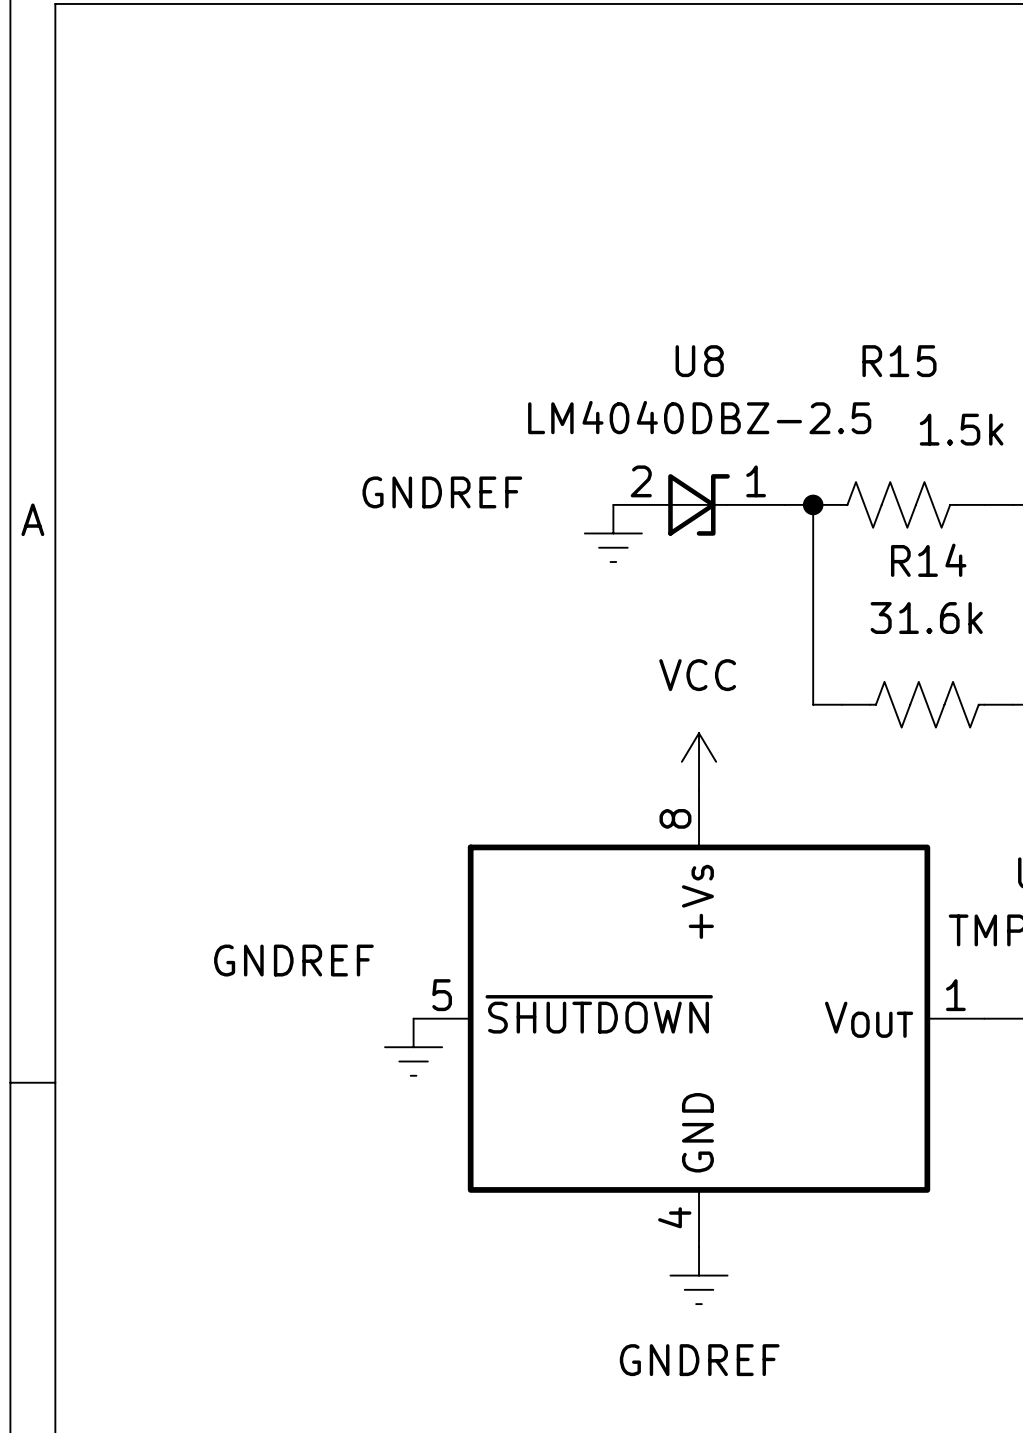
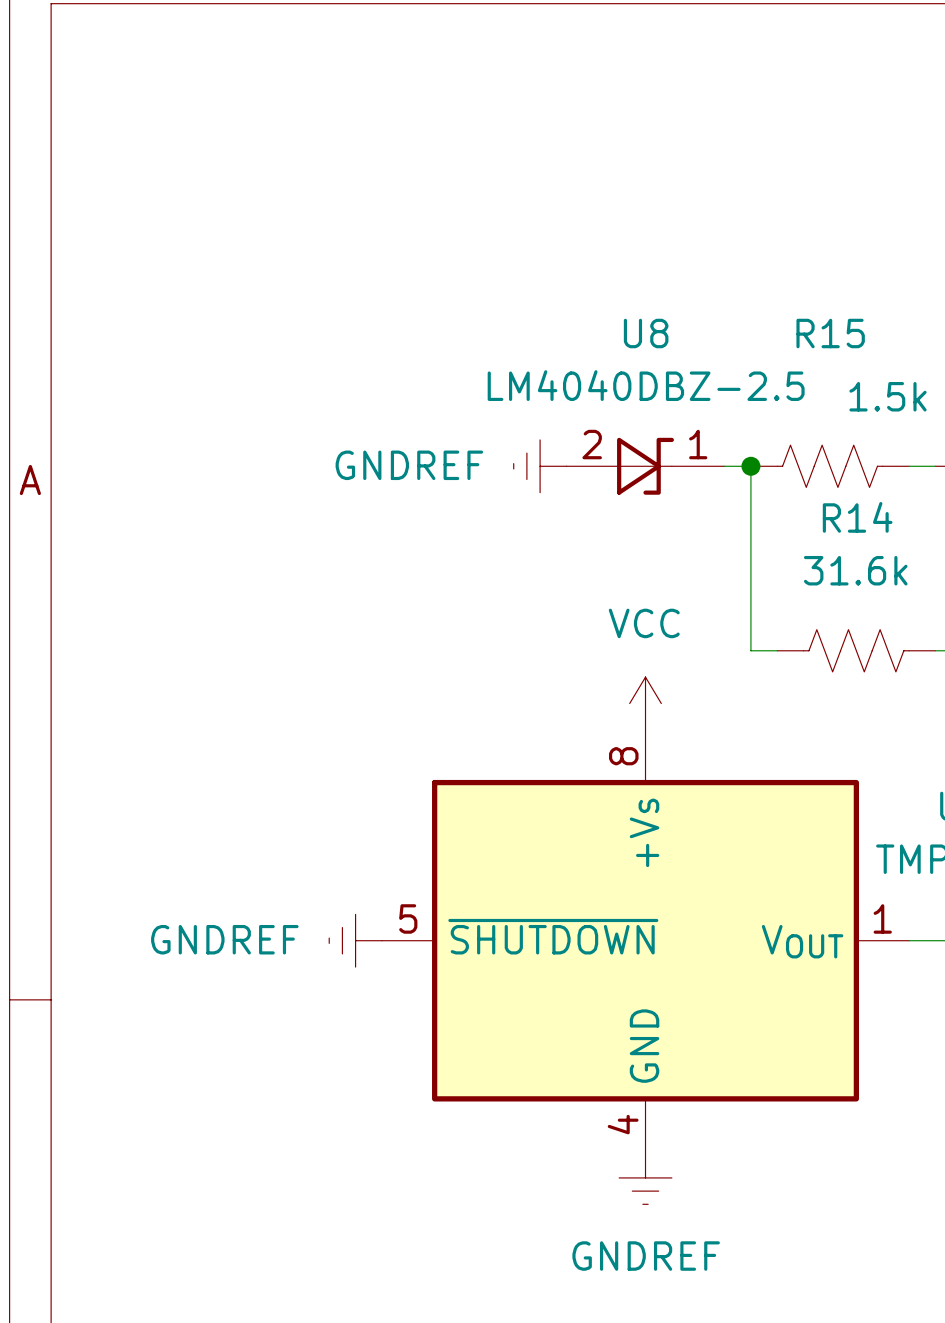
power symbol rotation: 0° (613, 533) -> 90° clockwise (540, 466)
power symbol position: GNDREF (613, 533) -> GNDREF (540, 466)
power symbol text position: GNDREF (293, 960) -> GNDREF (224, 939)
power symbol rotation: 0° (413, 1047) -> 90° clockwise (355, 940)
power symbol position: GNDREF (413, 1047) -> GNDREF (355, 940)

